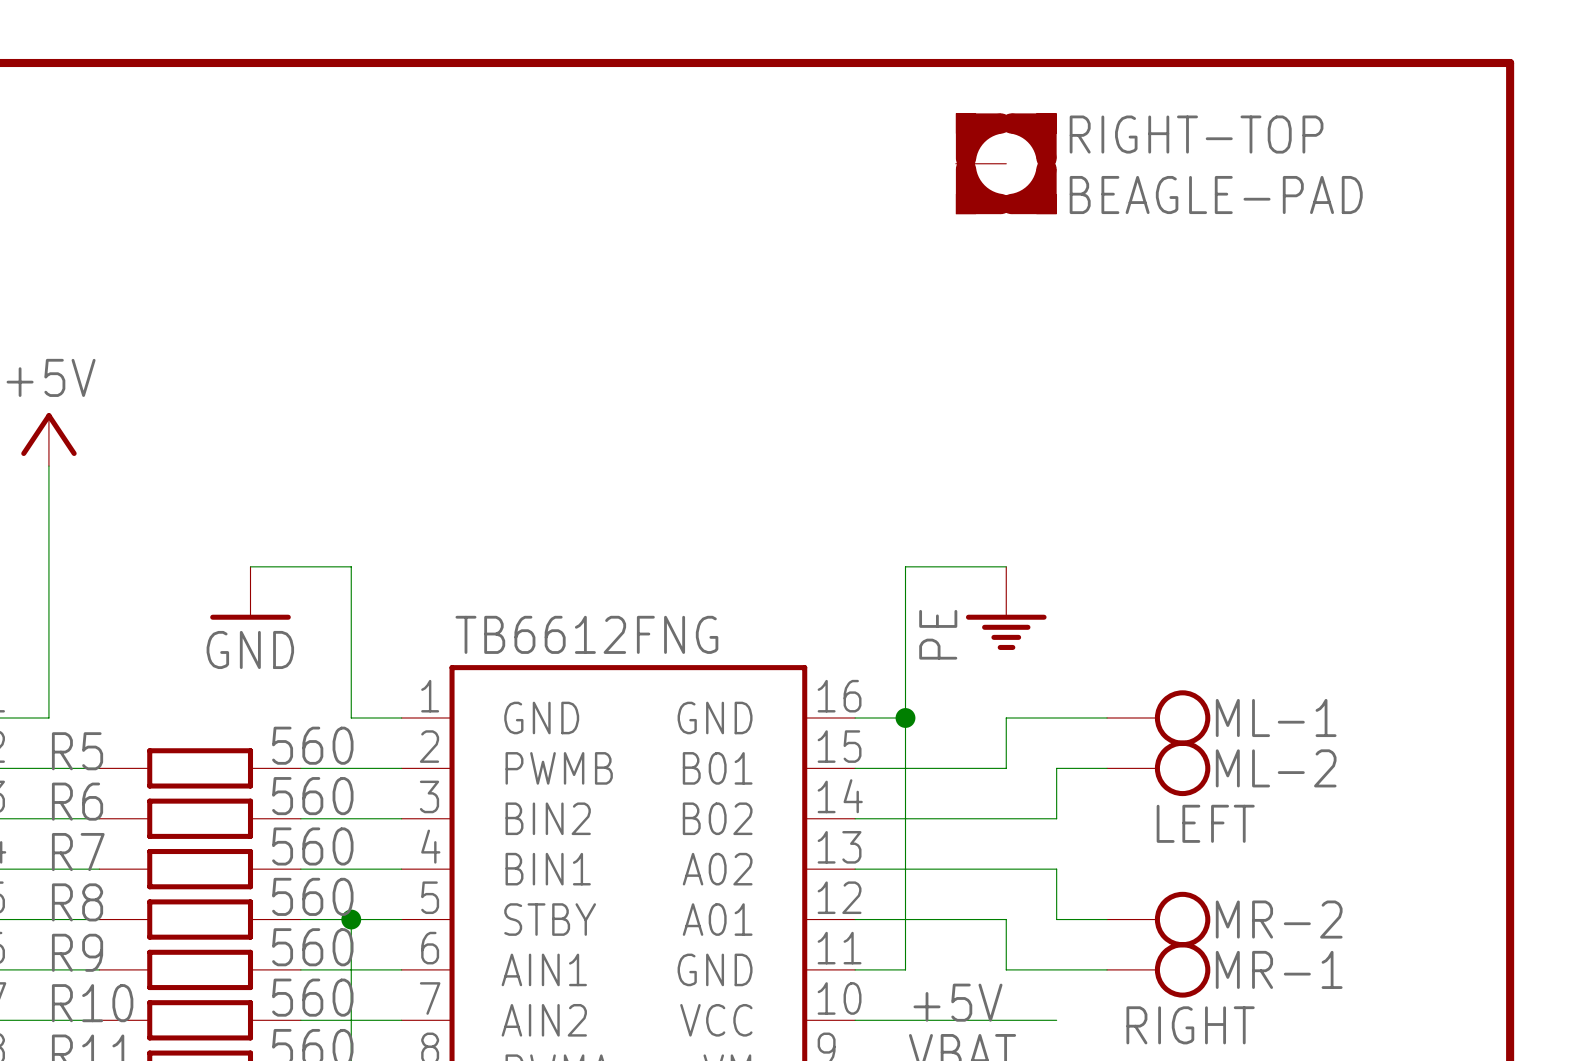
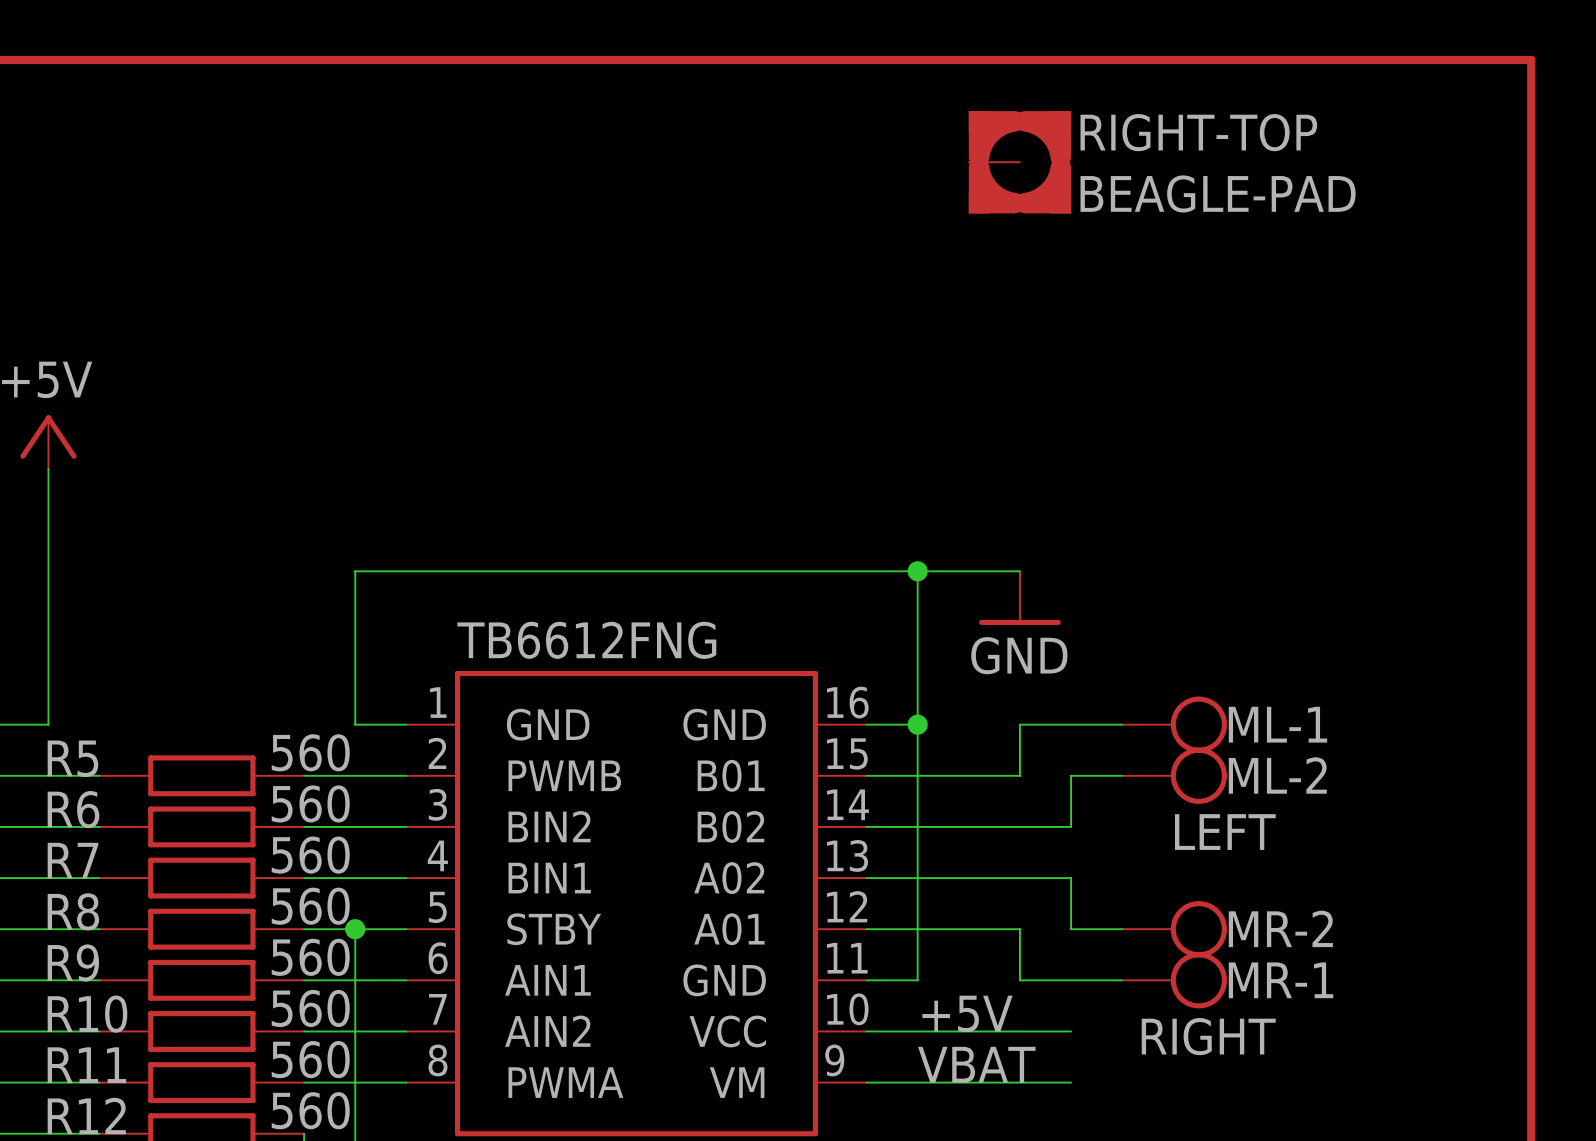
wire: (250, 566) (351, 566) -> (917, 571) (355, 571)
junction: none -> (917, 571)
power symbol: GND (250, 593) -> none
power symbol: PE (1006, 608) -> GND (1019, 598)

